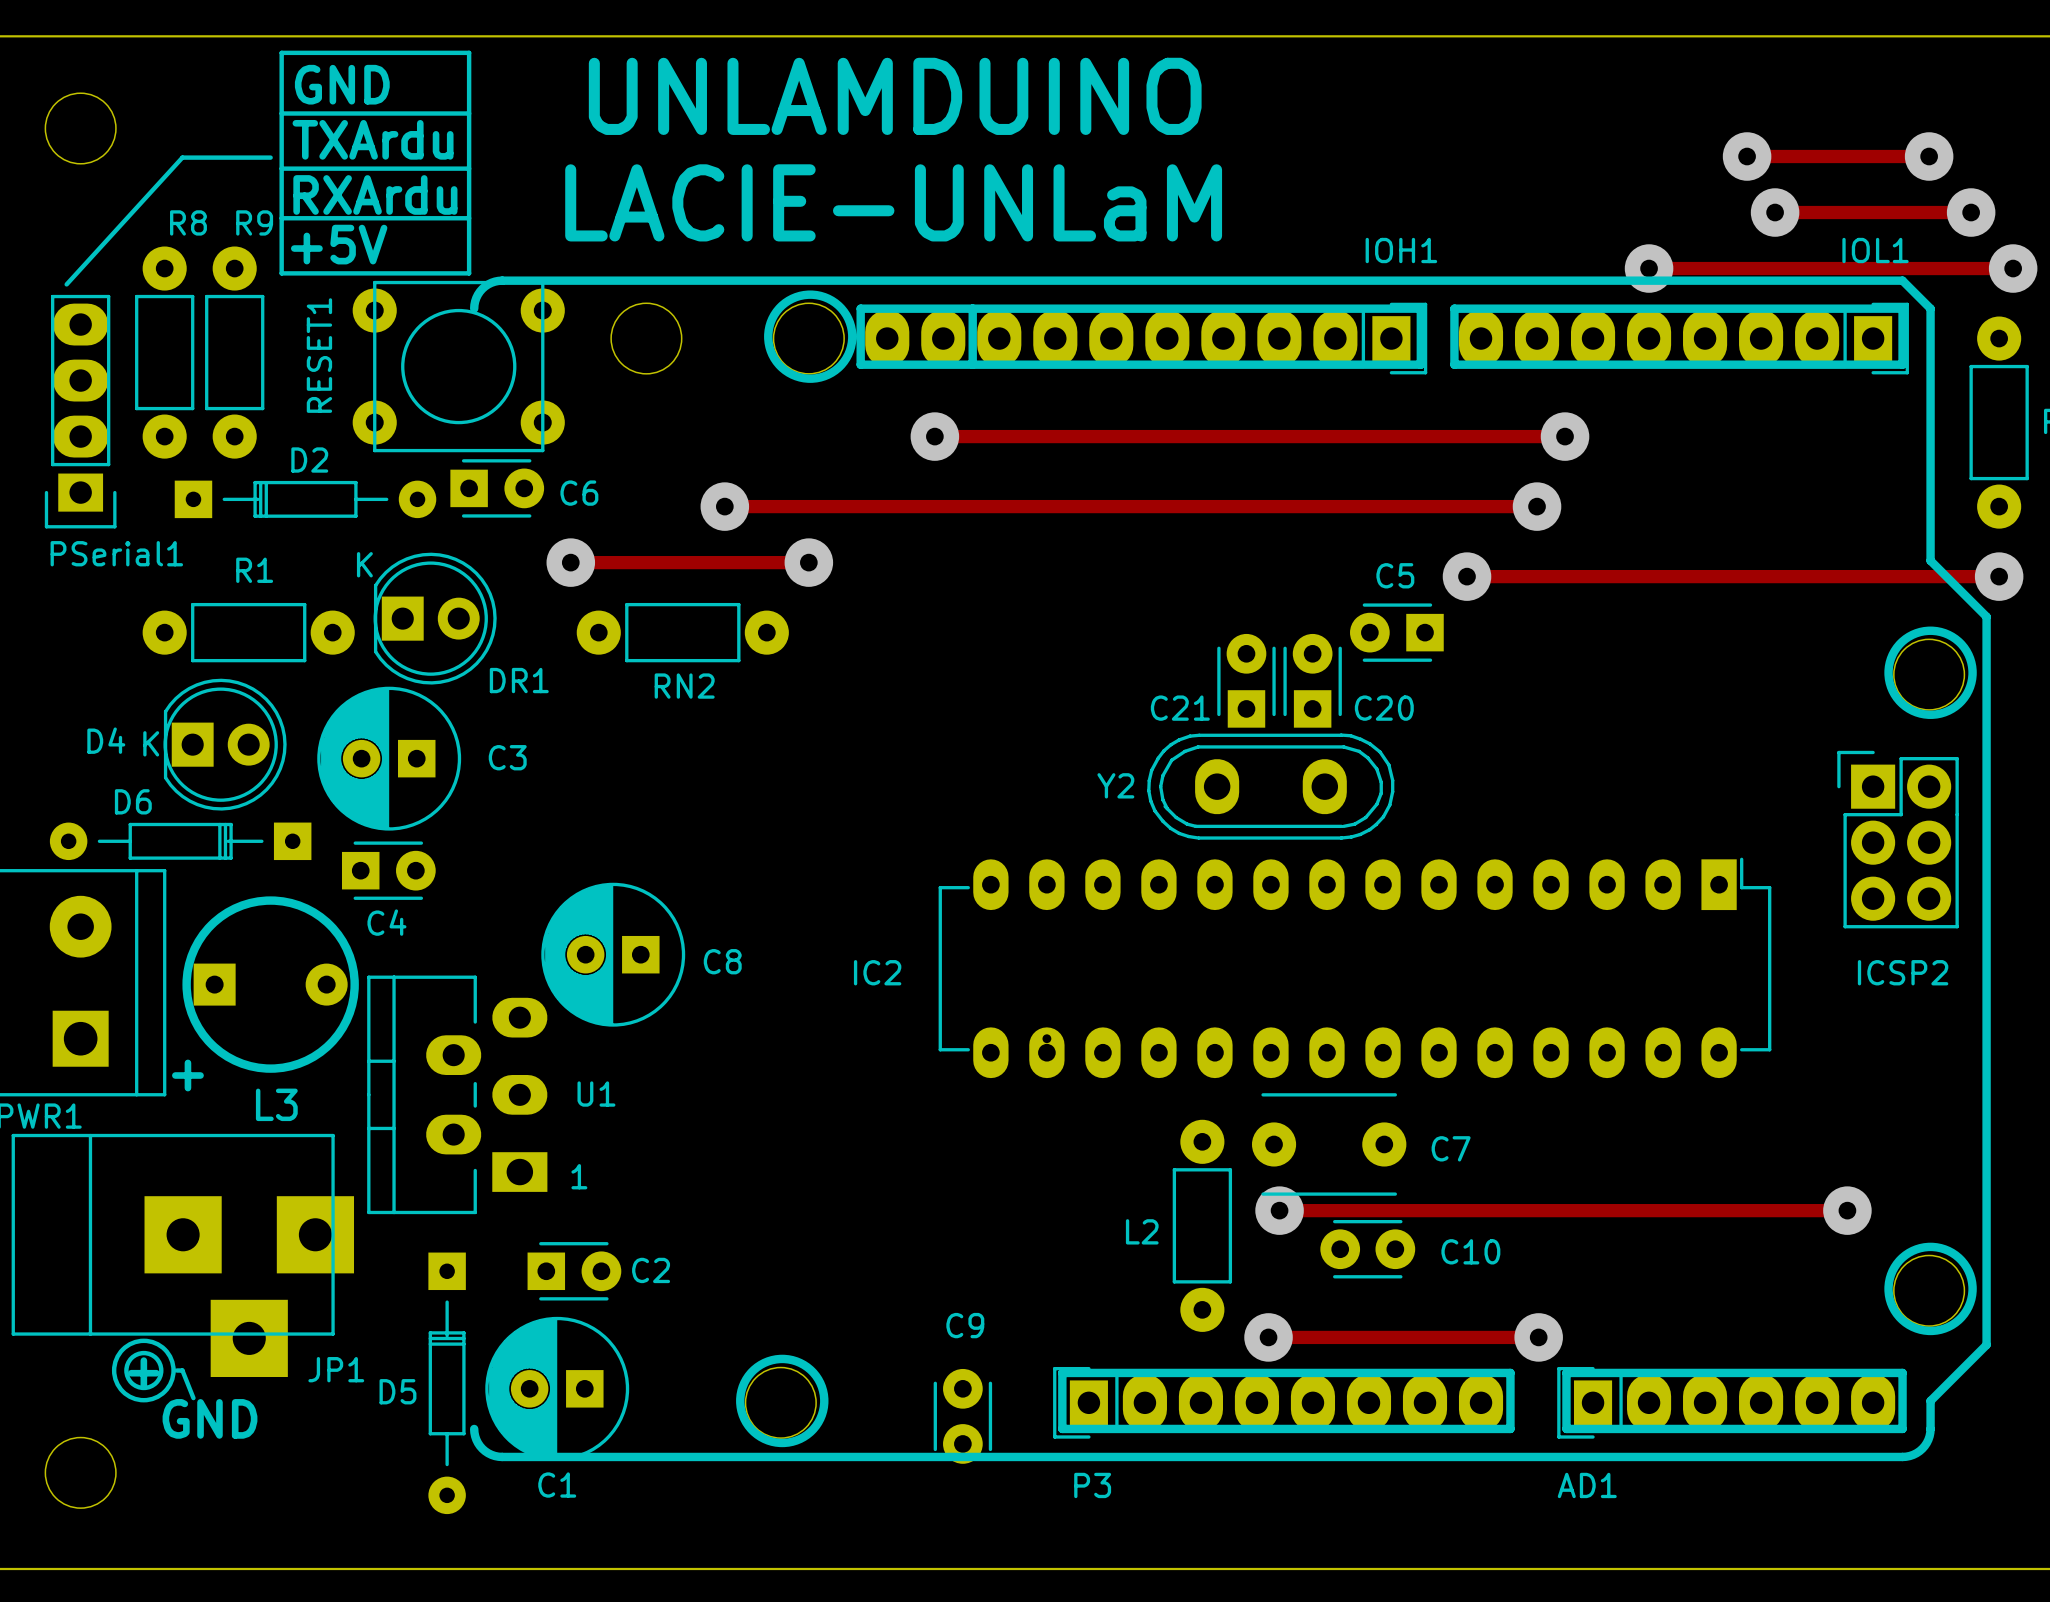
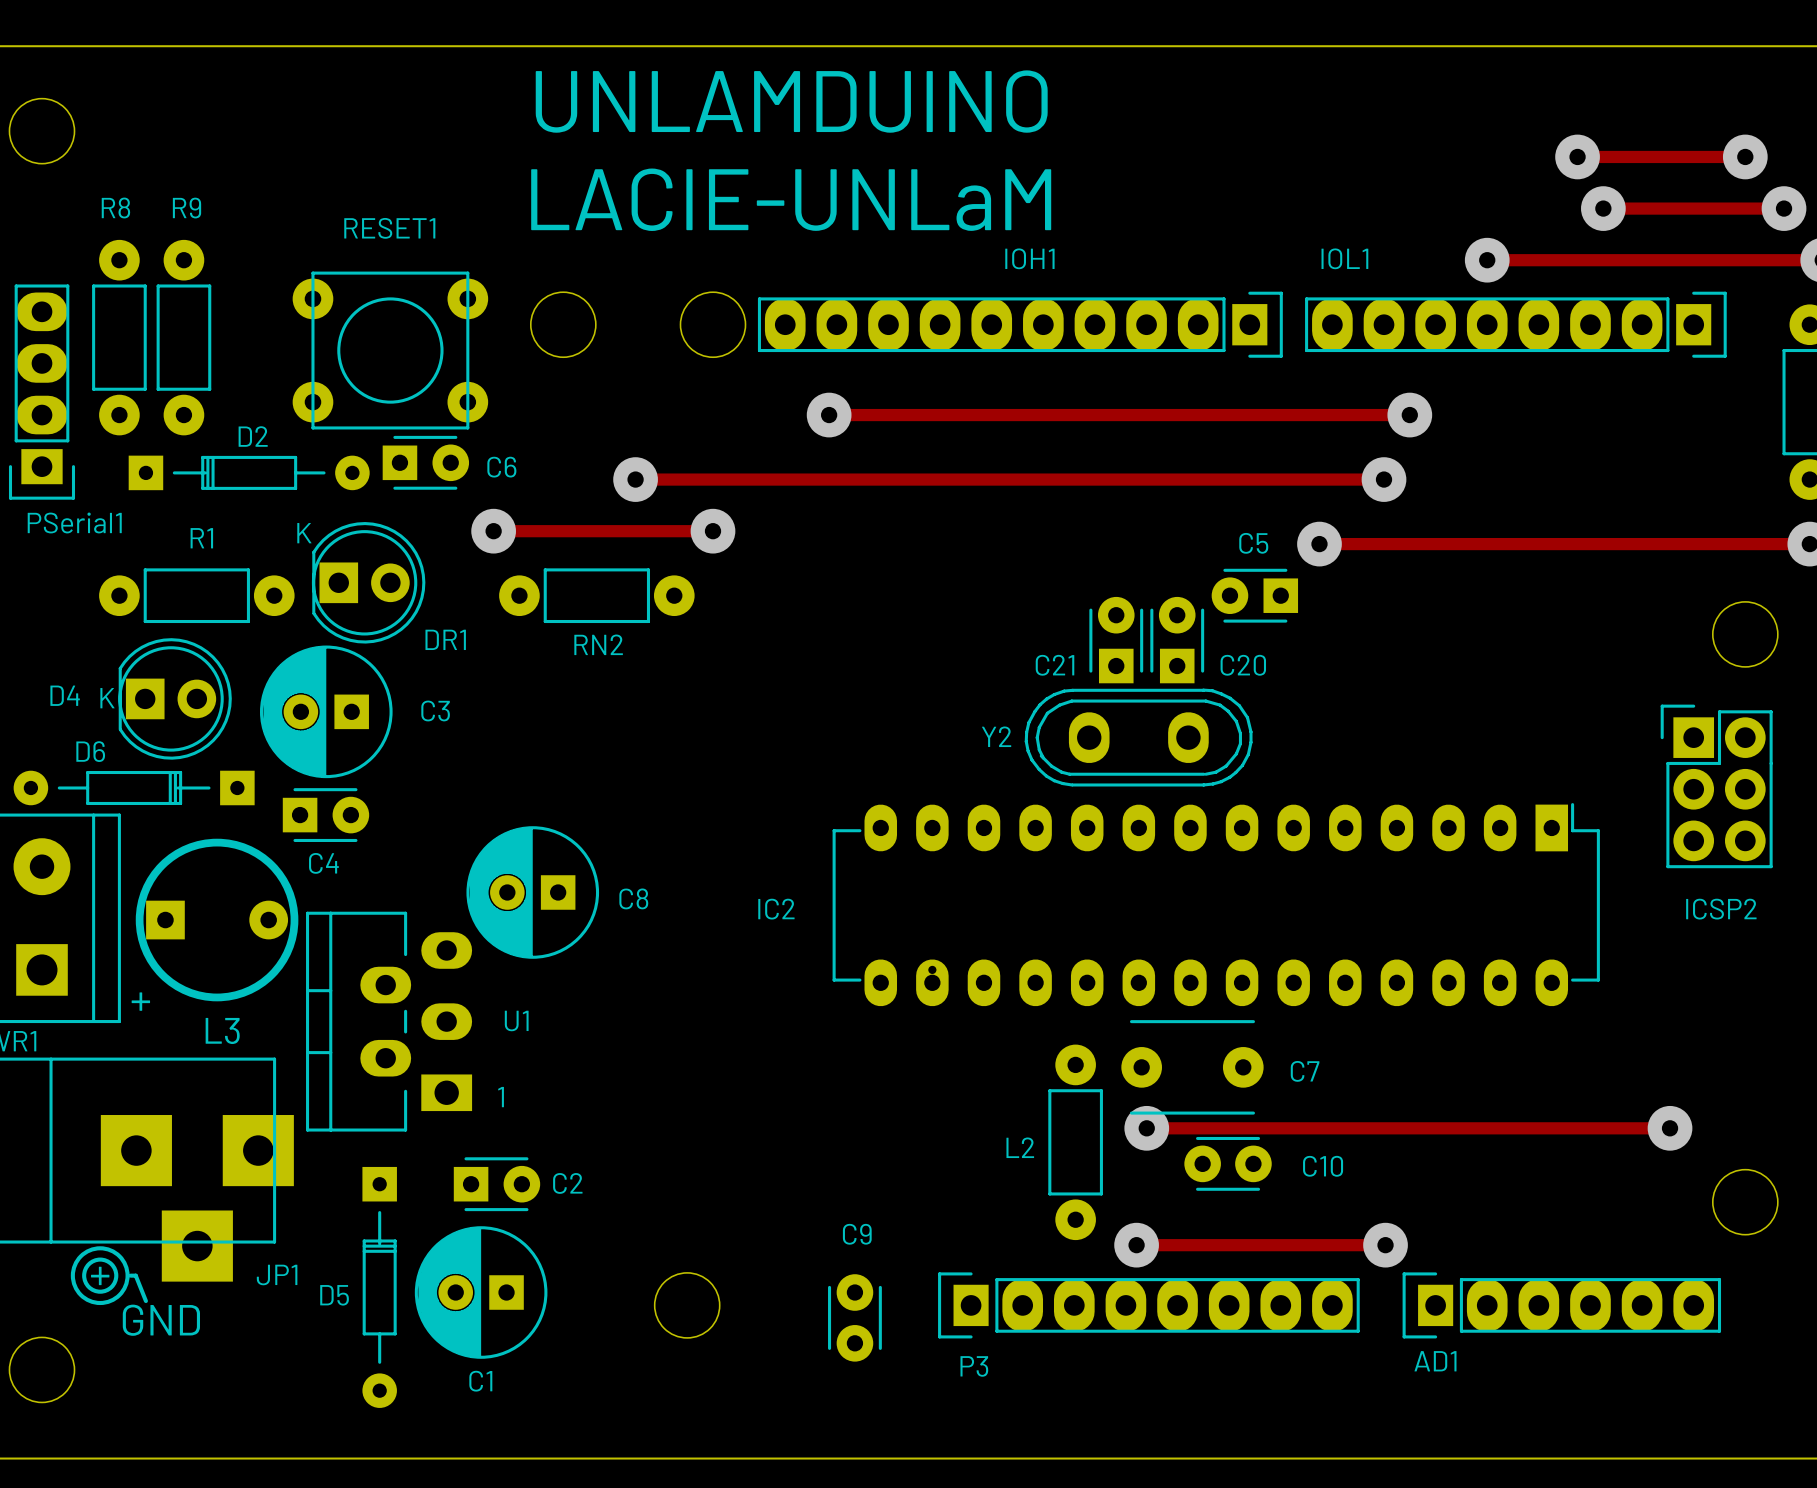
line: (281, 52) (469, 52) (469, 273) (281, 273) (281, 52) -> none
text: GND (342, 84) -> none
line: (281, 113) (469, 113) -> none
text: TXArdu (373, 139) -> none
line: (270, 157) (182, 157) (66, 284) -> none
line: (281, 168) (469, 168) -> none
text: RXArdu (375, 194) -> none
line: (281, 218) (469, 218) -> none
R8 name position: R8 (188, 222) -> R8 (115, 207)
R9 name position: R9 (254, 222) -> R9 (187, 208)
text: +5V (339, 244) -> none
IOH1 name position: IOH1 (1401, 250) -> IOH1 (1029, 258)
IOL1 name position: IOL1 (1875, 250) -> IOL1 (1344, 258)
drawing: [469, 276, 1991, 1462] -> none
RESET1 name rotation: 0° (319, 355) -> 90° clockwise (389, 228)
RESET1 name position: RESET1 (319, 355) -> RESET1 (389, 228)
P3 name position: P3 (1092, 1485) -> P3 (974, 1366)
AD1 name position: AD1 (1587, 1485) -> AD1 (1435, 1361)

